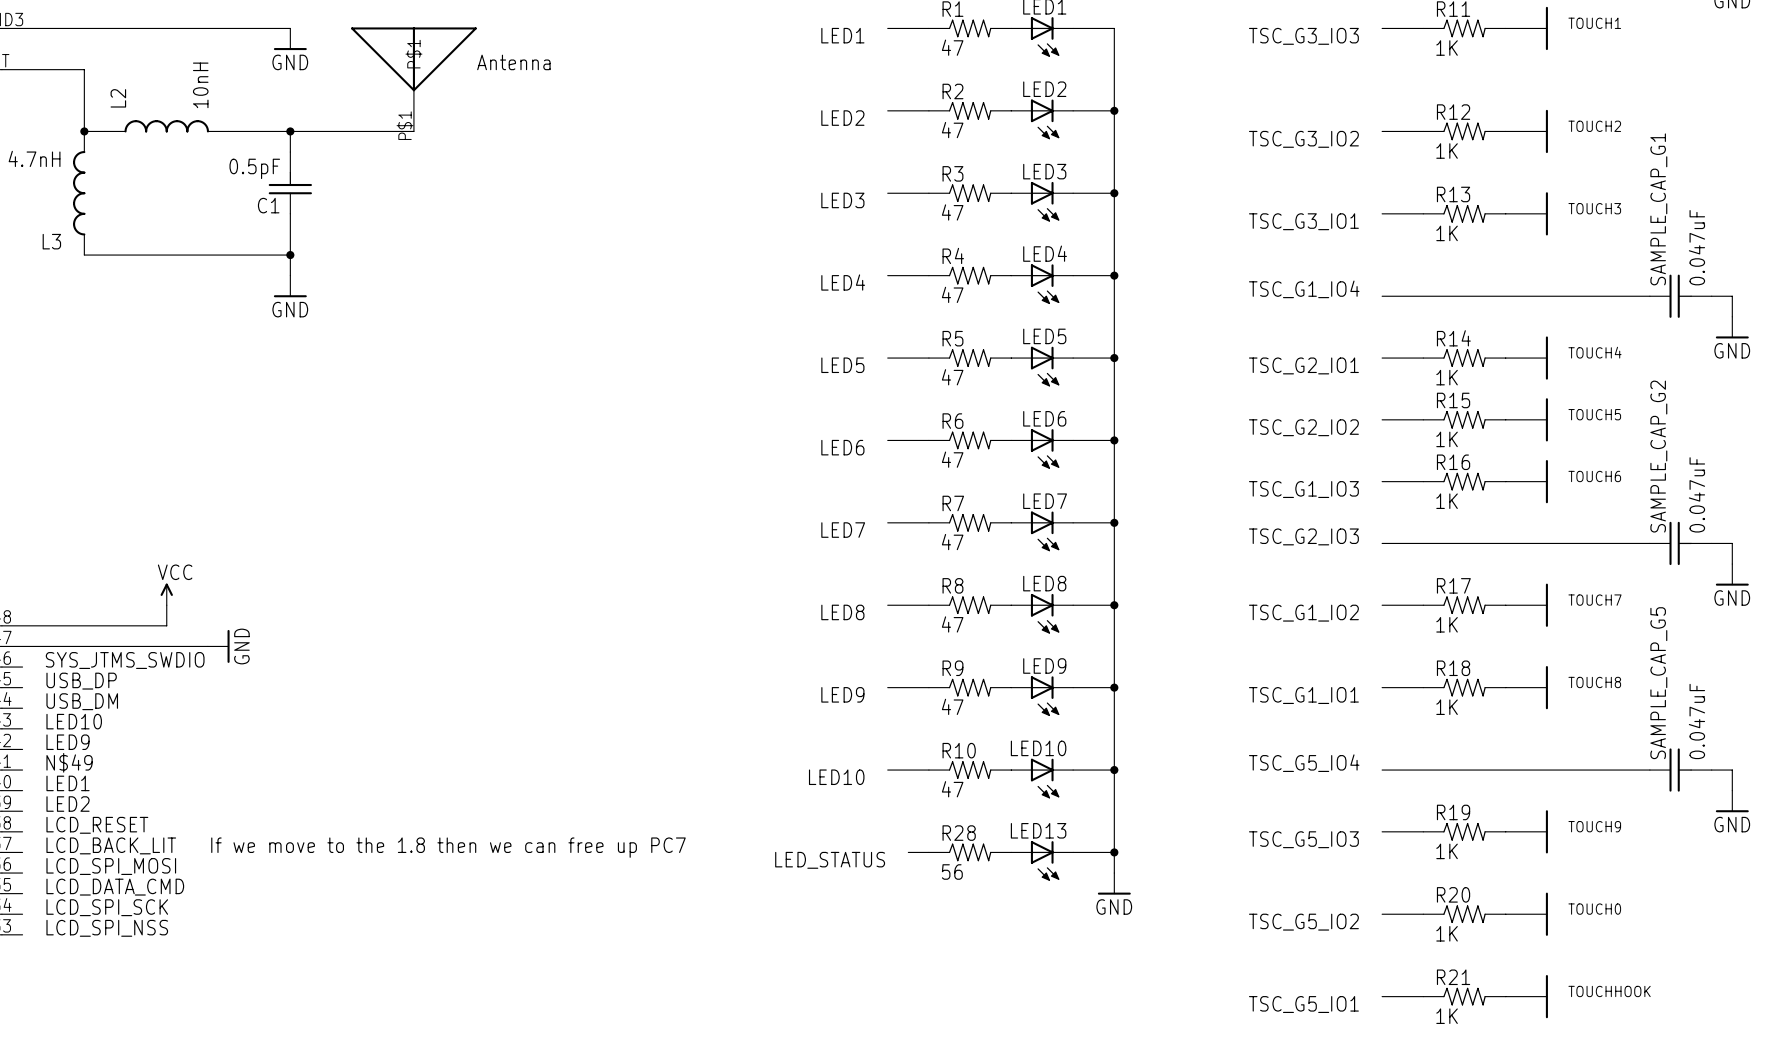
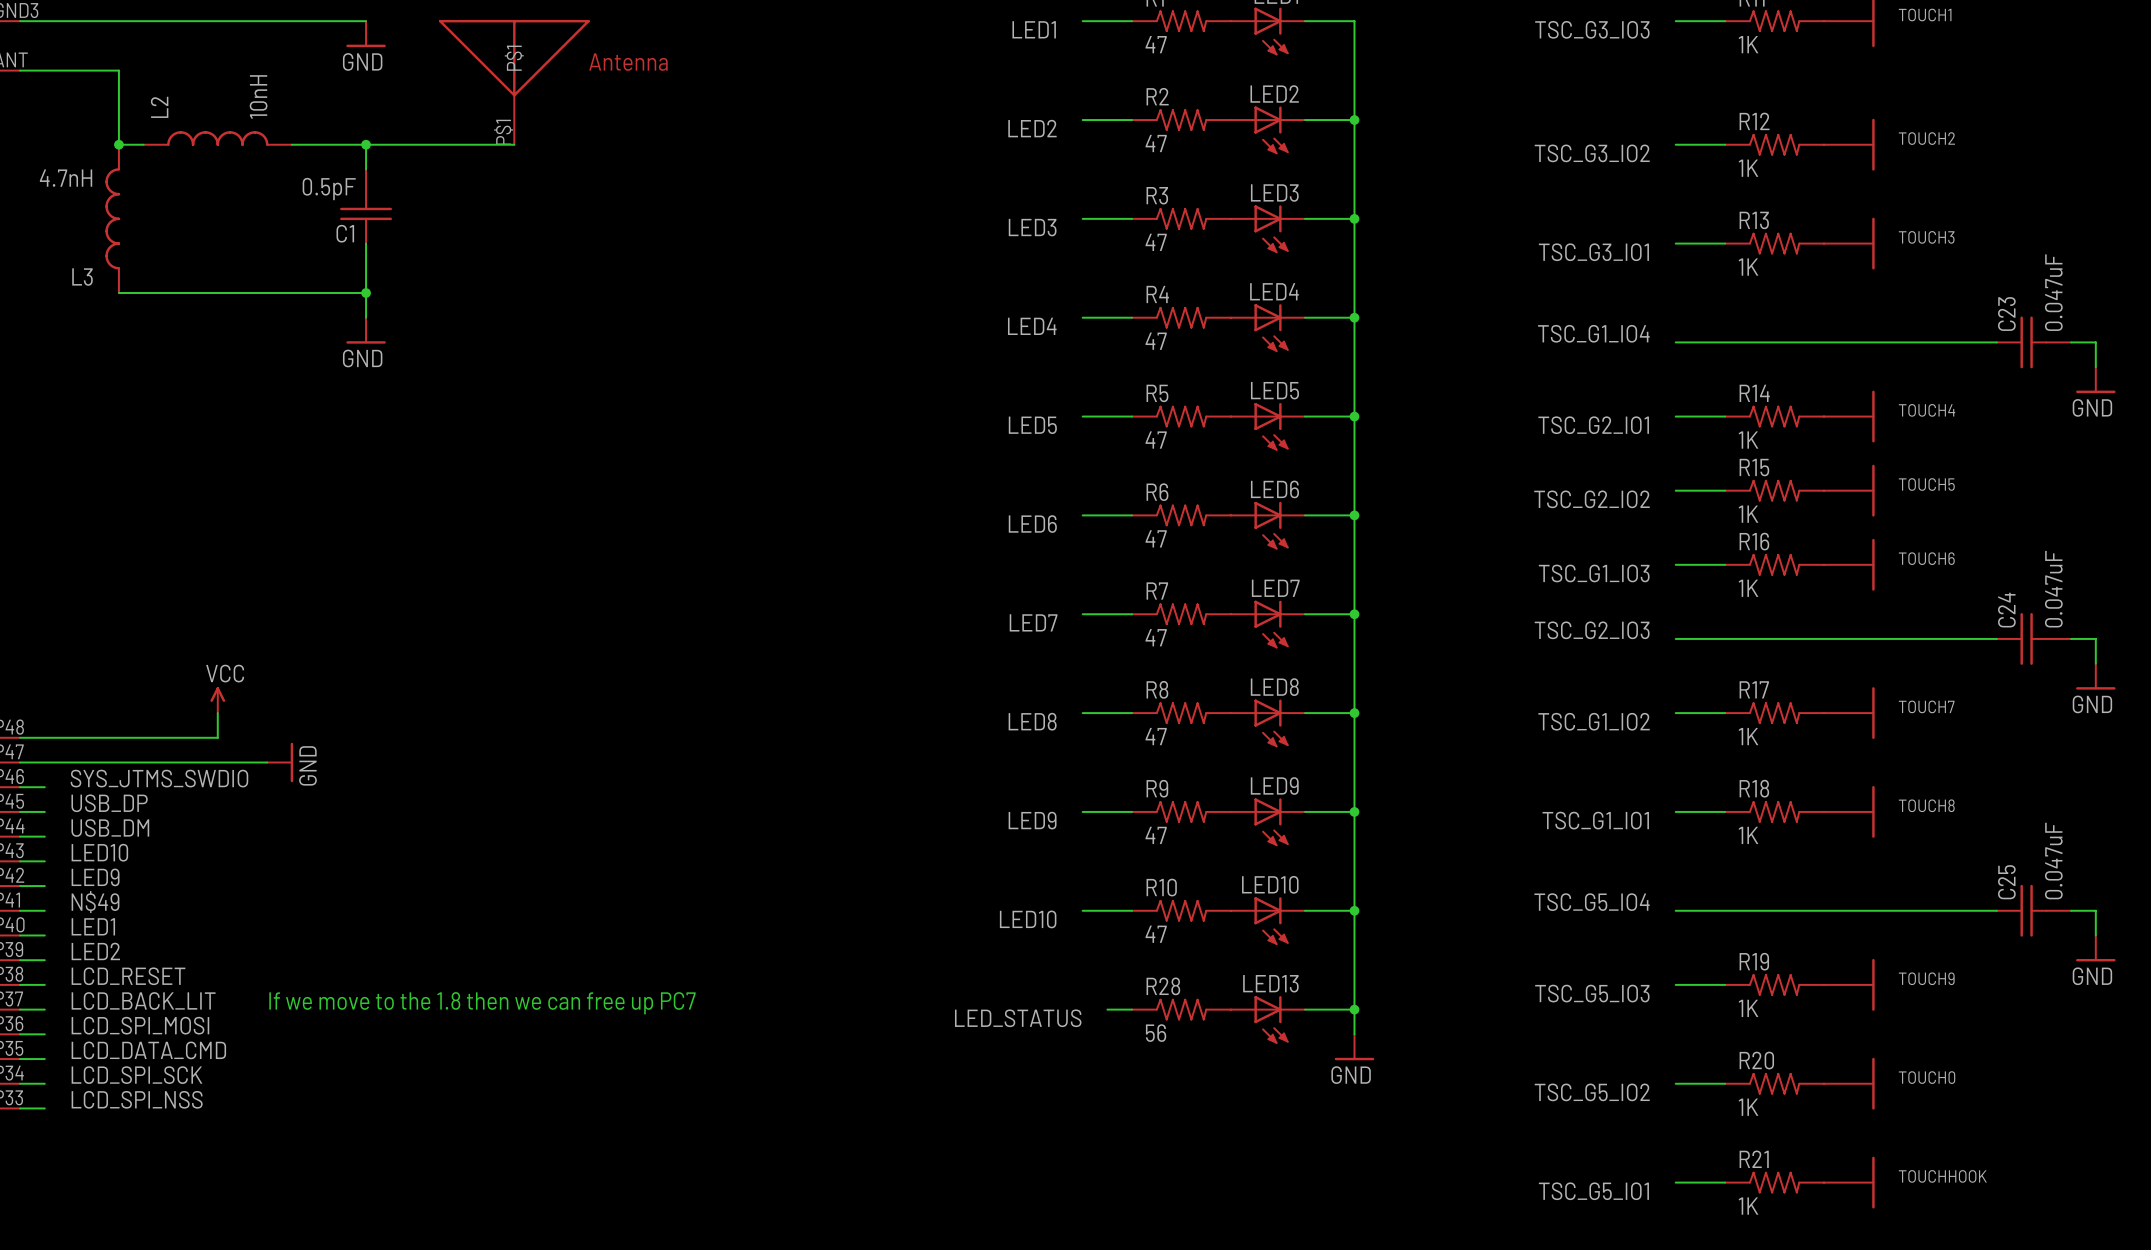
SAMPLE_CAP_G1 name: SAMPLE_CAP_G1 (1658, 209) -> C23 (2006, 314)
SAMPLE_CAP_G2 name: SAMPLE_CAP_G2 (1658, 456) -> C24 (2006, 610)
SAMPLE_CAP_G5 name: SAMPLE_CAP_G5 (1658, 683) -> C25 (2006, 882)

